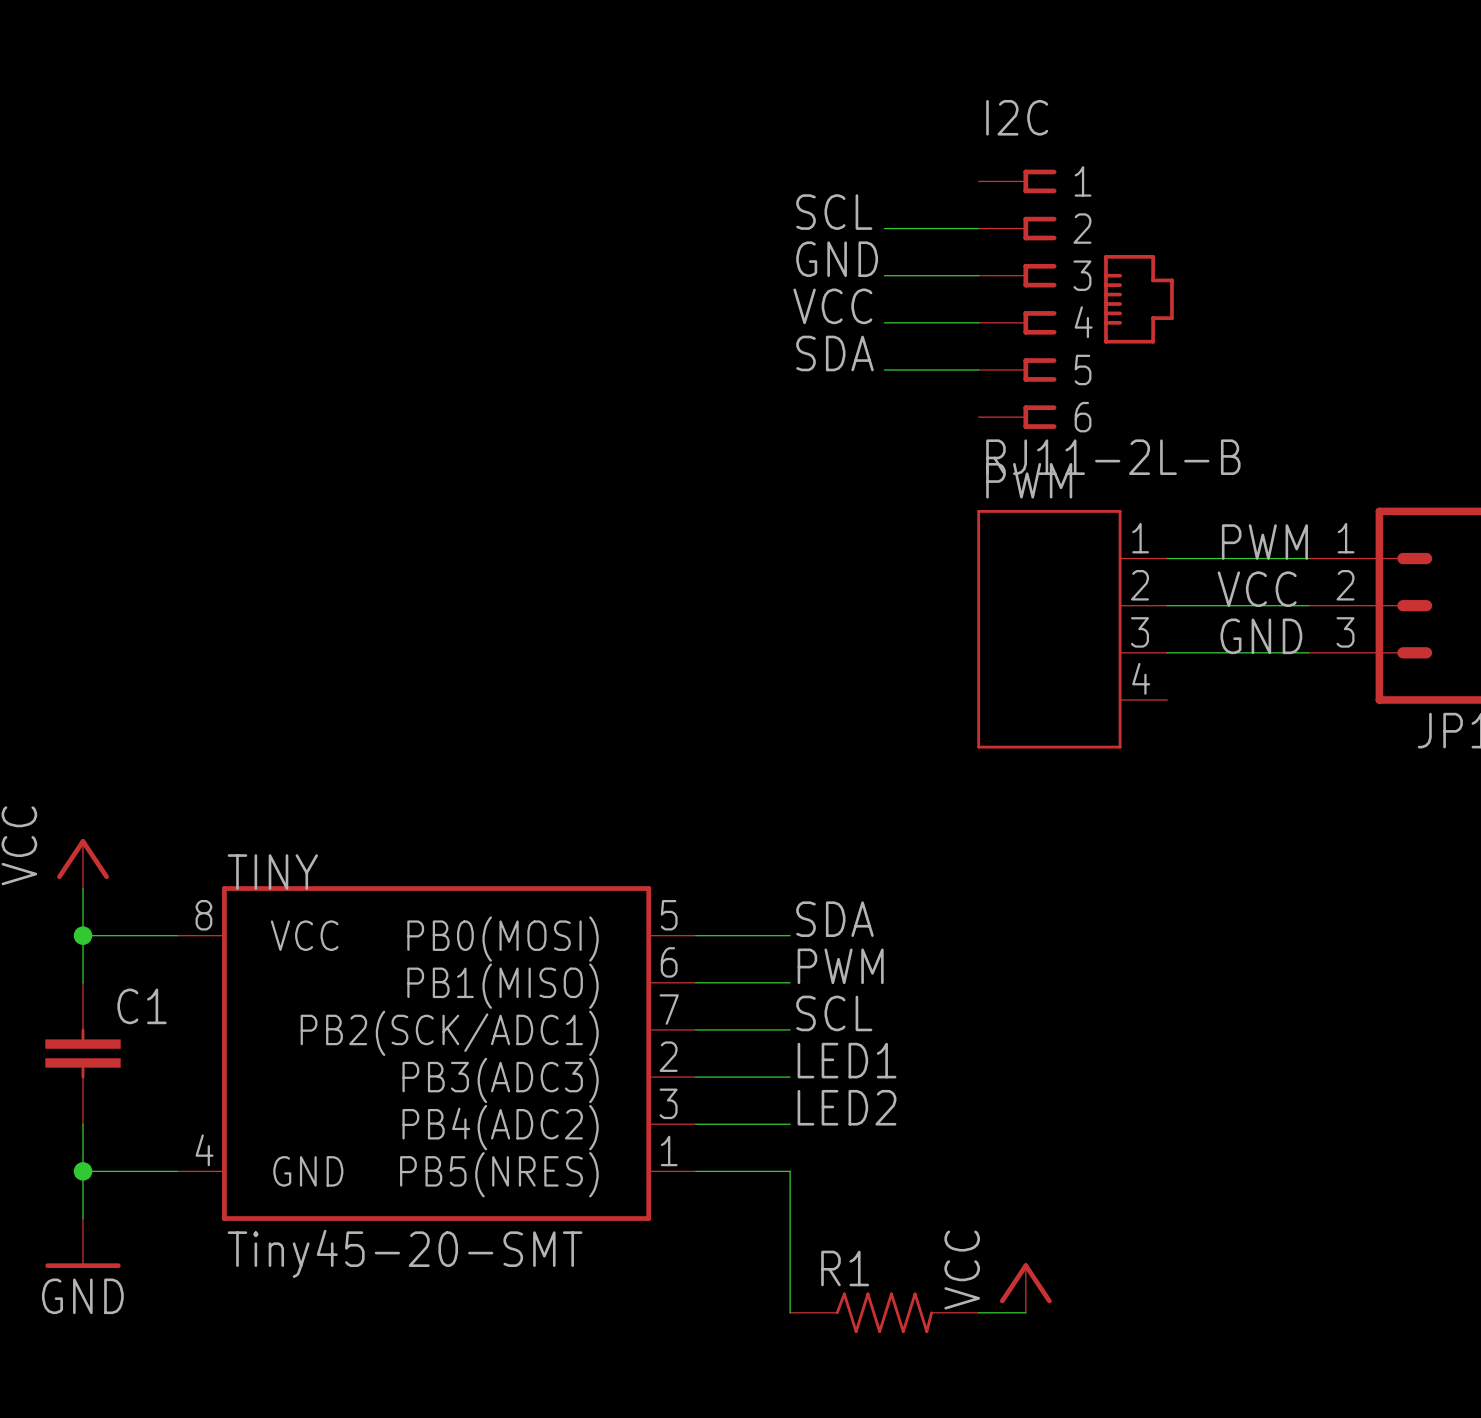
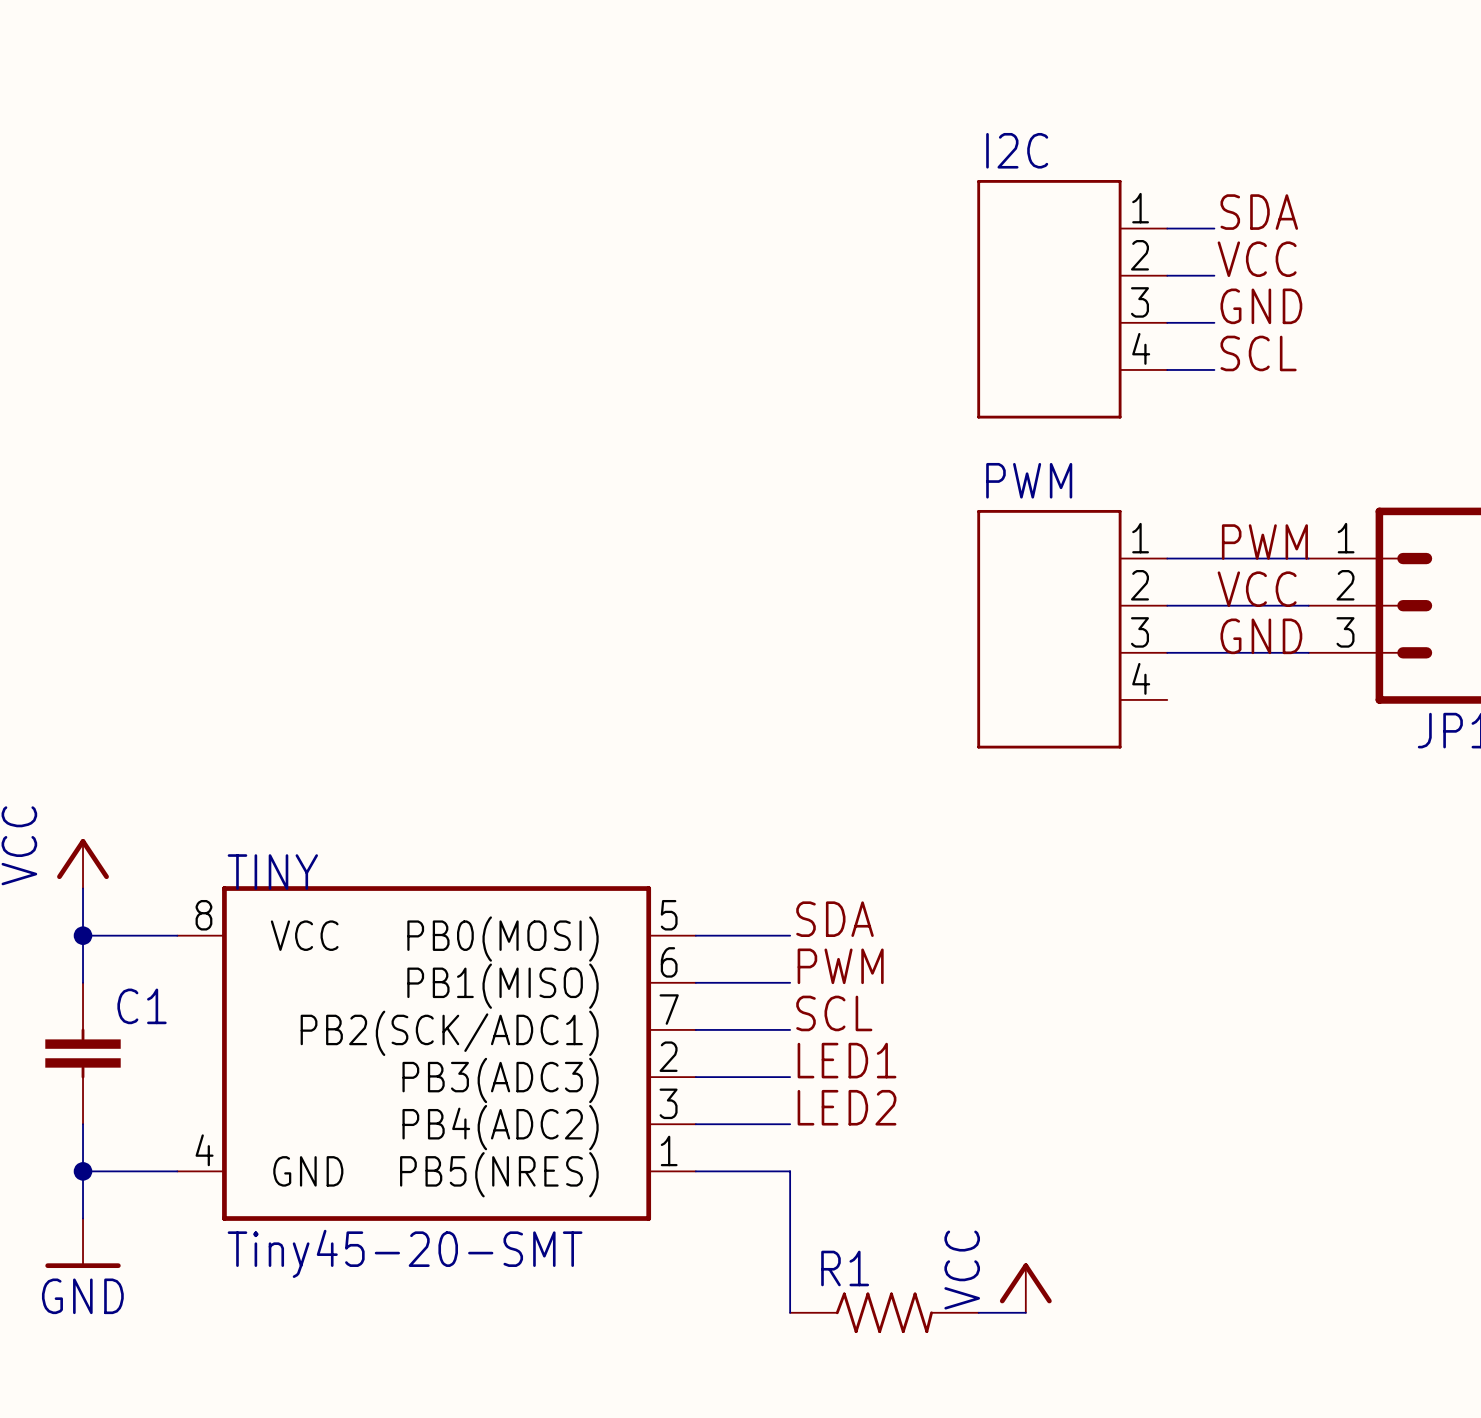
I2C symbol: [978, 169, 1174, 429] -> [977, 180, 1168, 419]
label position: SCL (834, 212) -> SCL (1258, 353)
wire: (884, 228) (978, 228) -> none
wire: none -> (1167, 228) (1214, 228)
label position: GND (837, 259) -> GND (1261, 306)
wire: (884, 275) (978, 275) -> none
wire: none -> (1167, 275) (1214, 275)
label position: VCC (832, 306) -> VCC (1257, 259)
wire: (884, 322) (978, 322) -> none
wire: none -> (1167, 322) (1214, 322)
label position: SDA (834, 353) -> SDA (1259, 212)
wire: (884, 369) (978, 369) -> none
wire: none -> (1167, 369) (1214, 369)
I2C value: RJ11-2L-B (1113, 457) -> none

